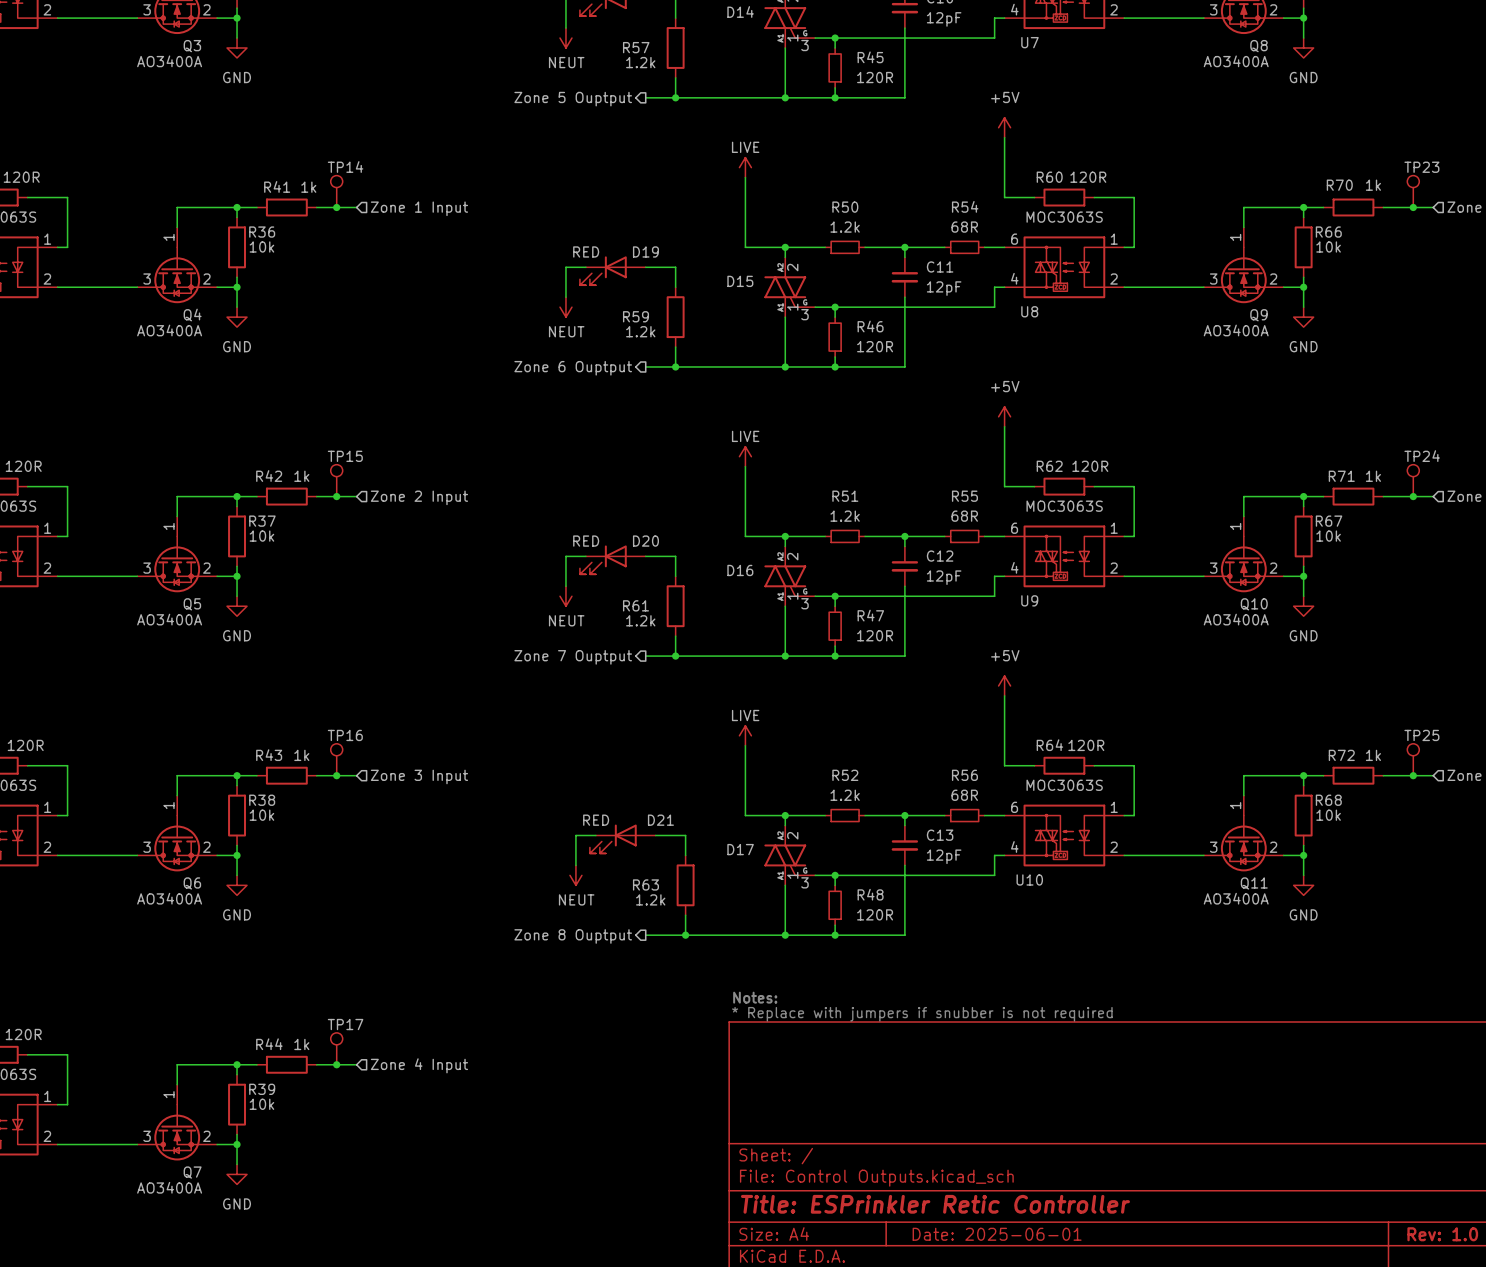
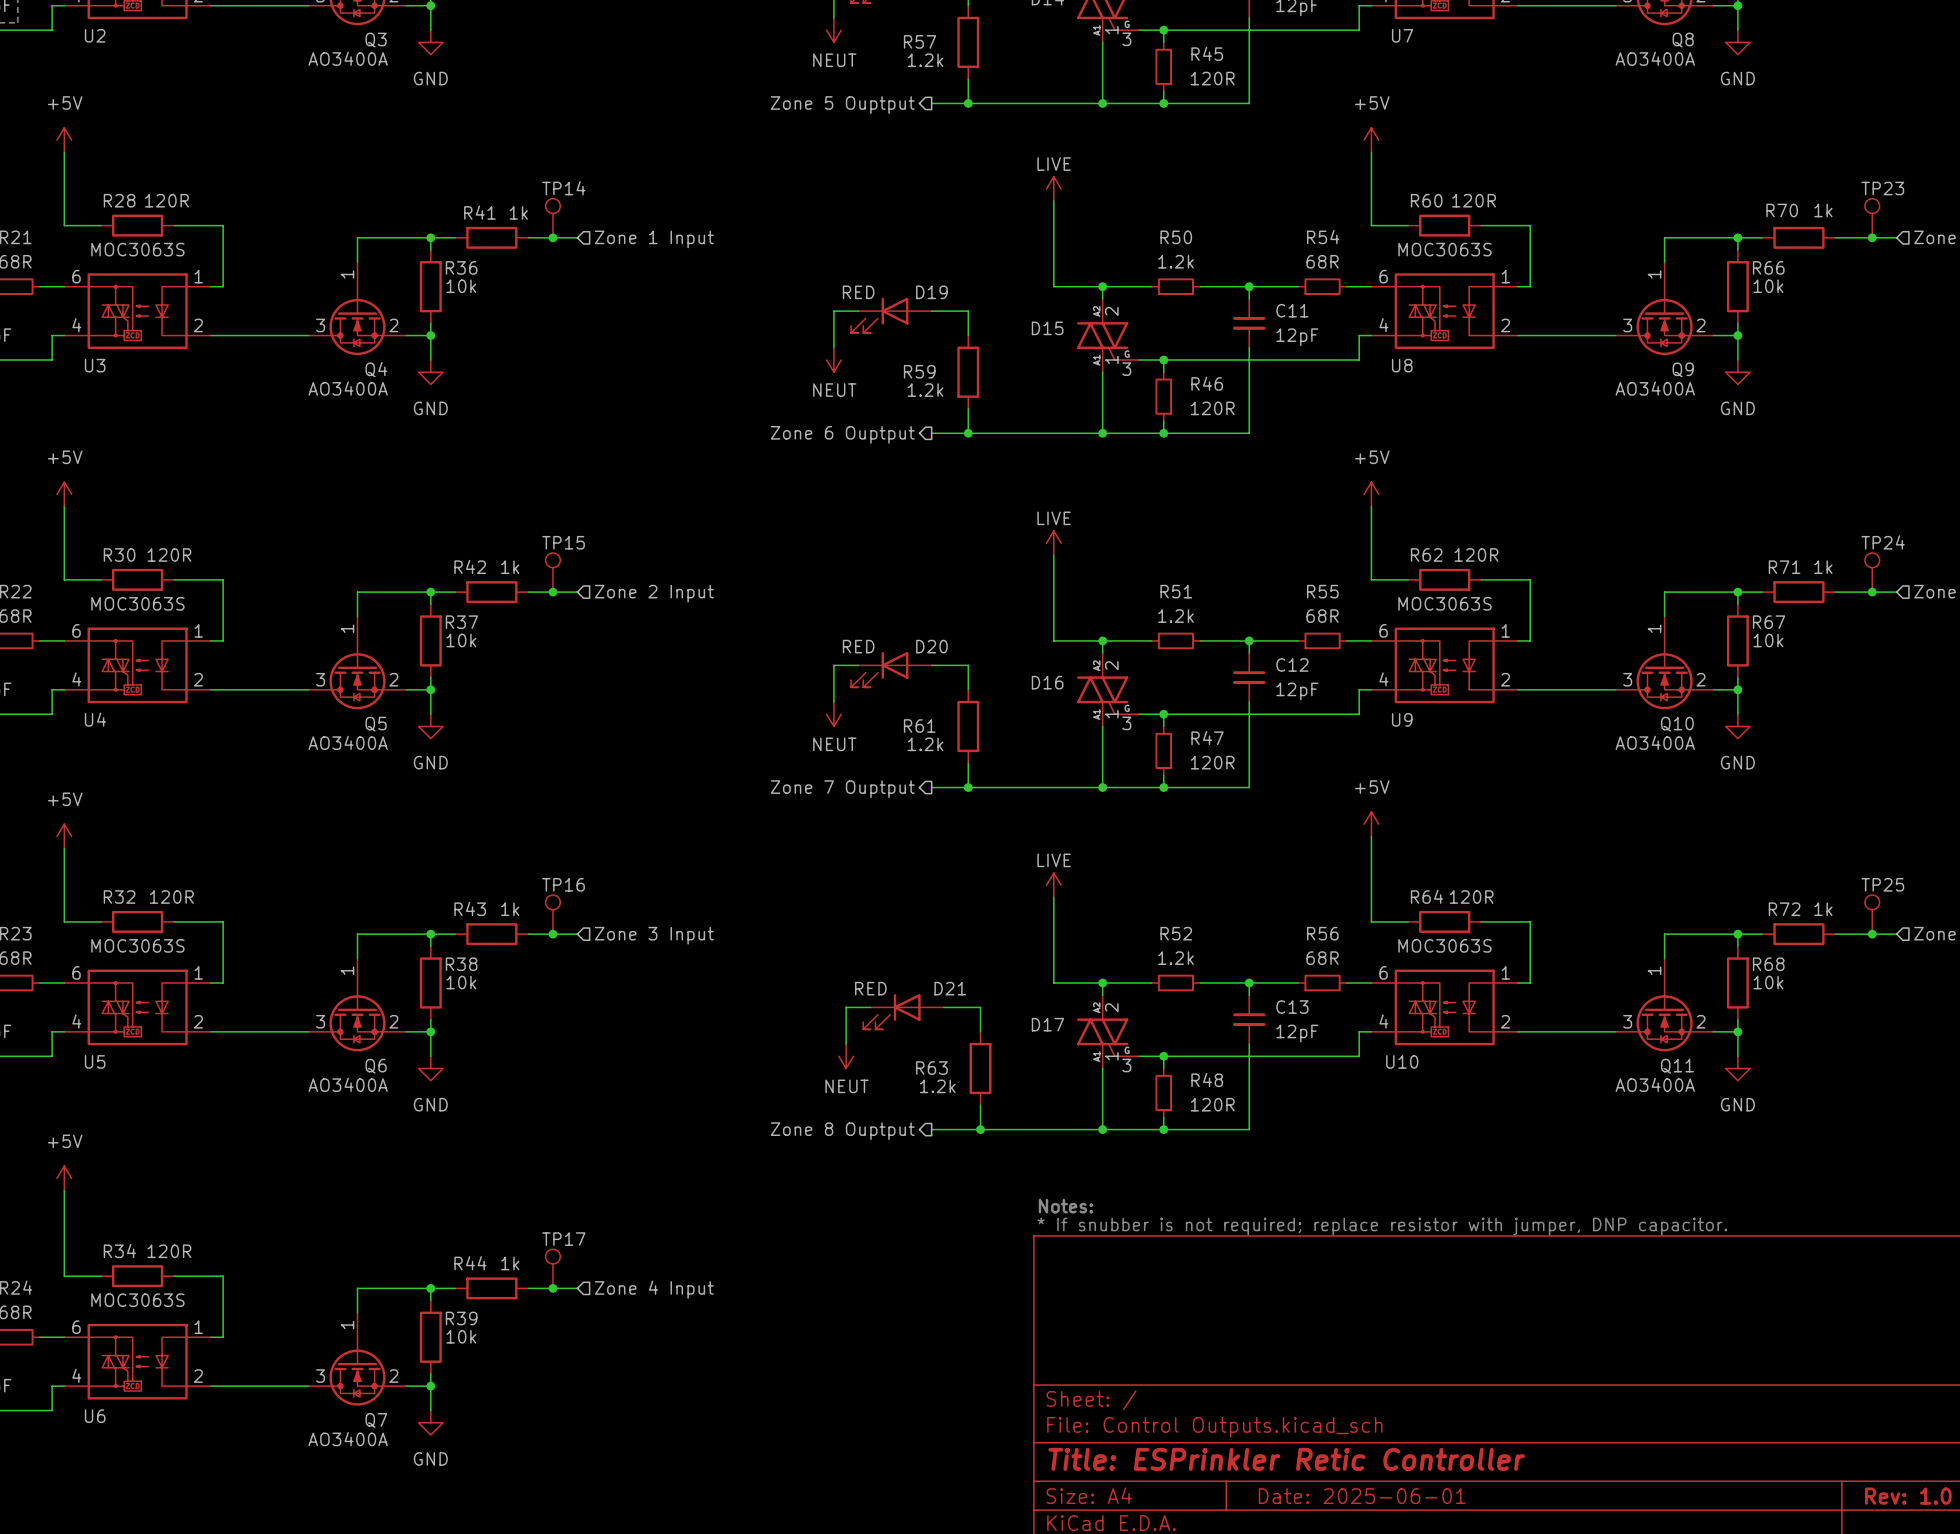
text: * Replace with jumpers if snubber is not required (922, 1014) -> * If snubber is not required; replace resistor with jumper, DNP capacitor. (1382, 1226)

